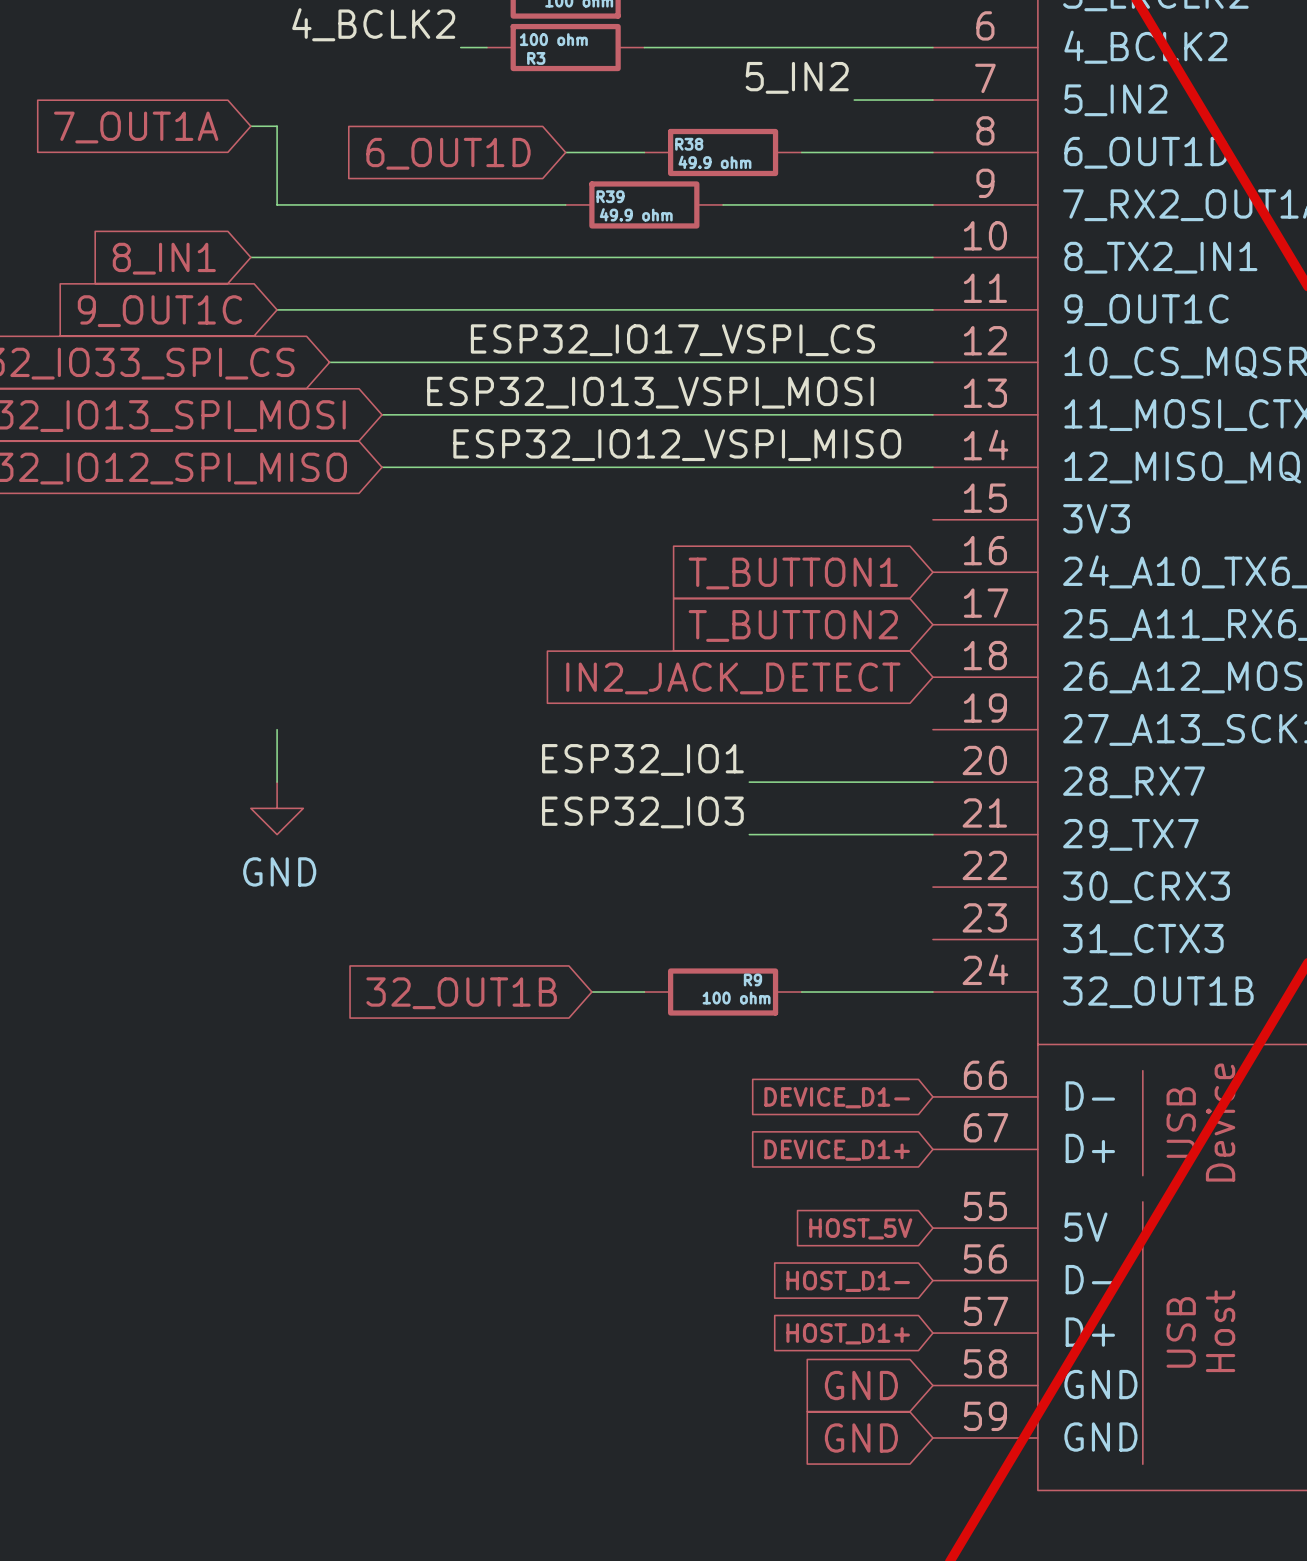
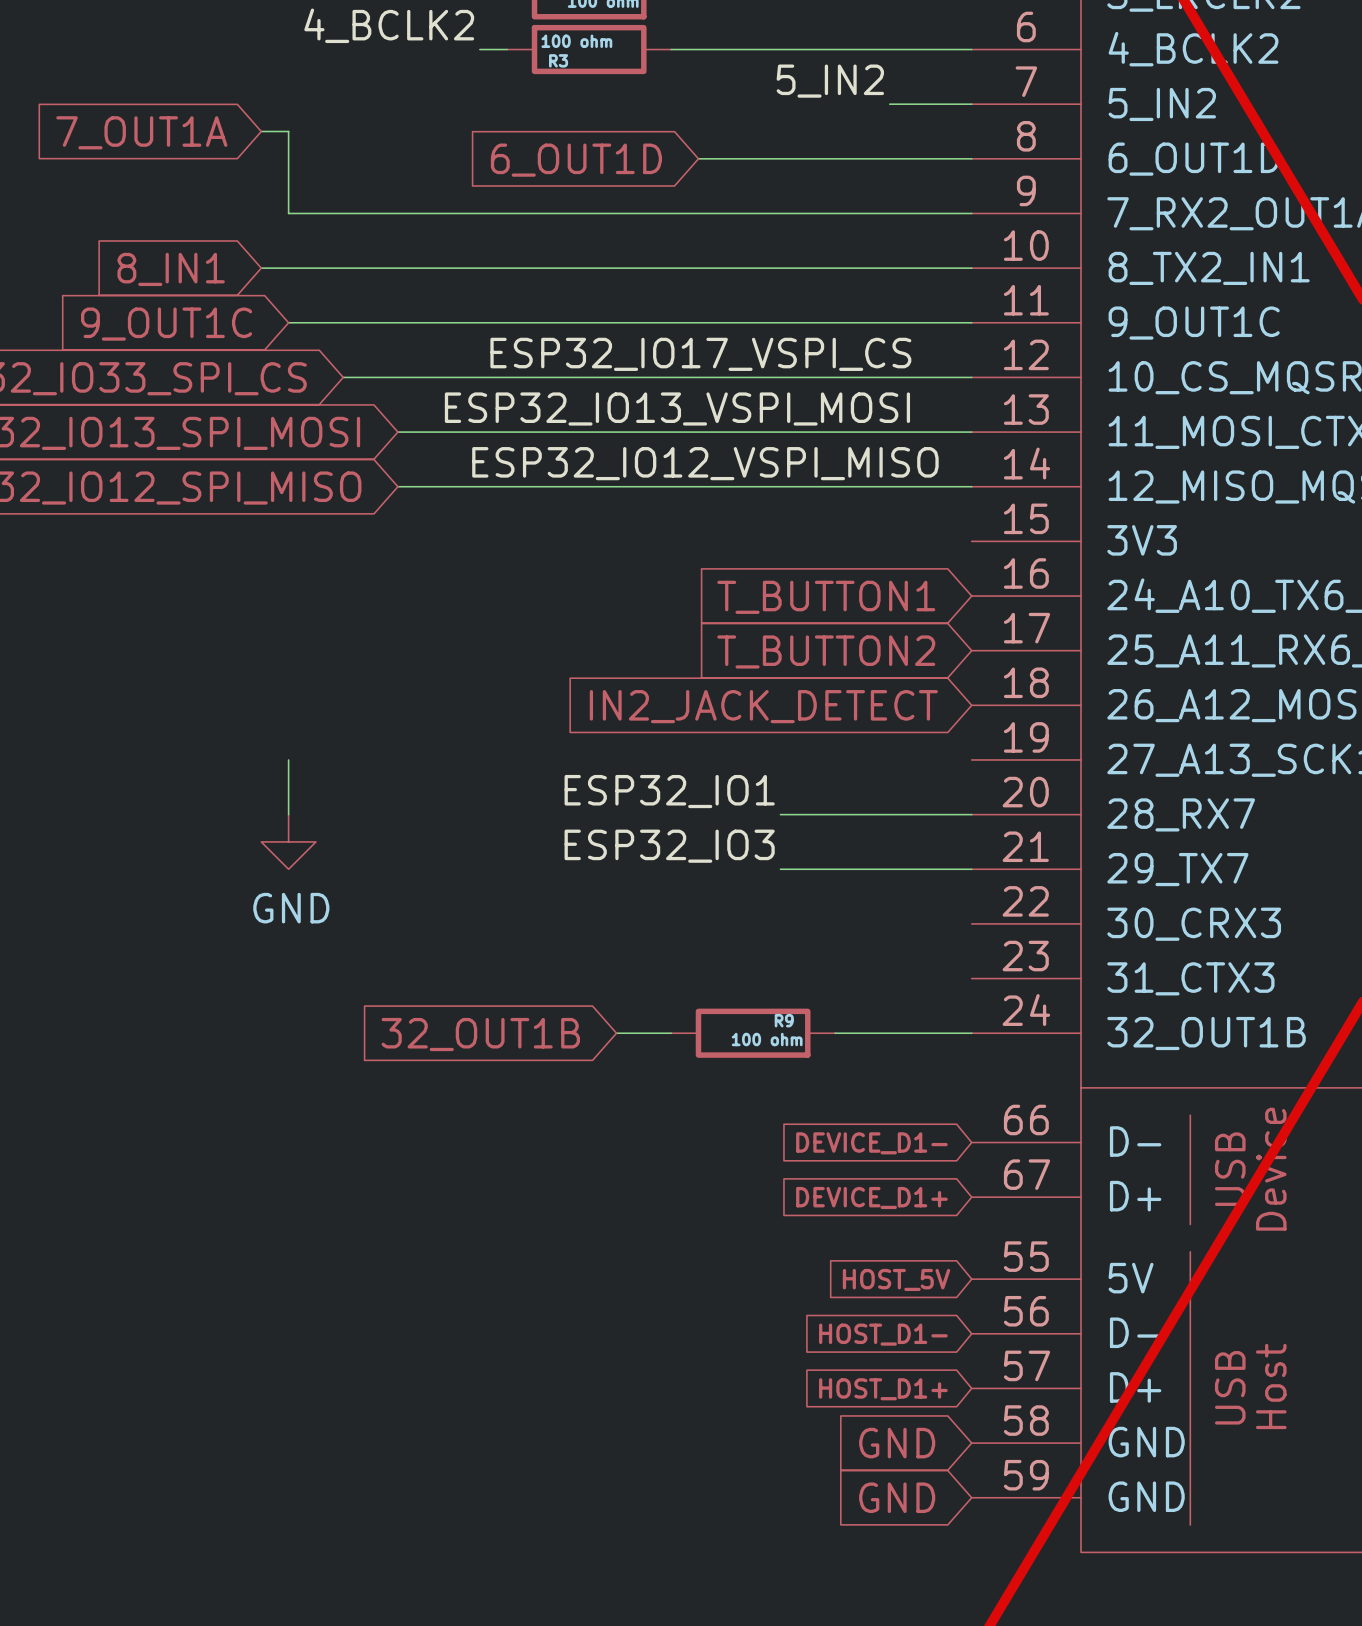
wire: (565, 152) (644, 152) -> none
wire: none -> (698, 158) (835, 158)
R38: 49.9 ohm (723, 152) -> none
global label position: 6_OUT1D (448, 153) -> 6_OUT1D (576, 160)
wire: none -> (589, 213) (753, 213)
R39: 49.9 ohm (644, 204) -> none

